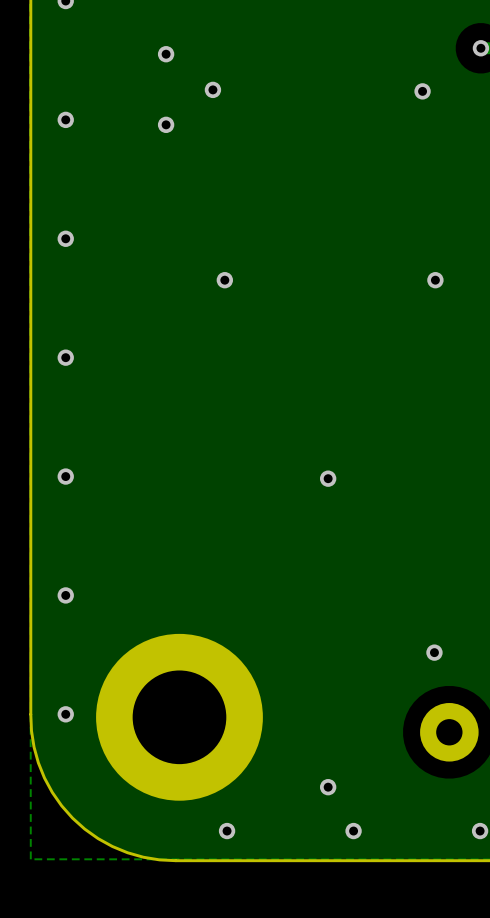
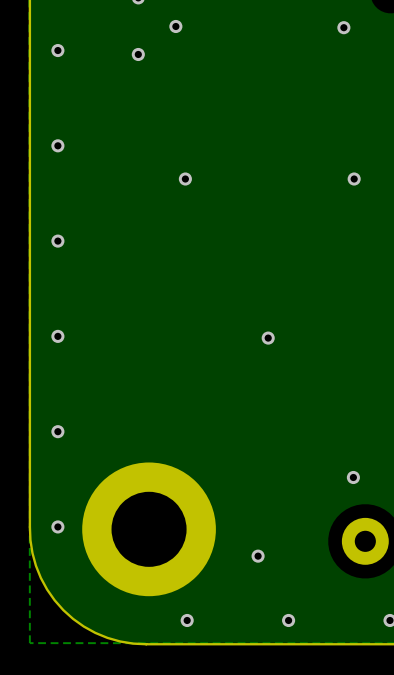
via position: (328, 787) -> (258, 556)

